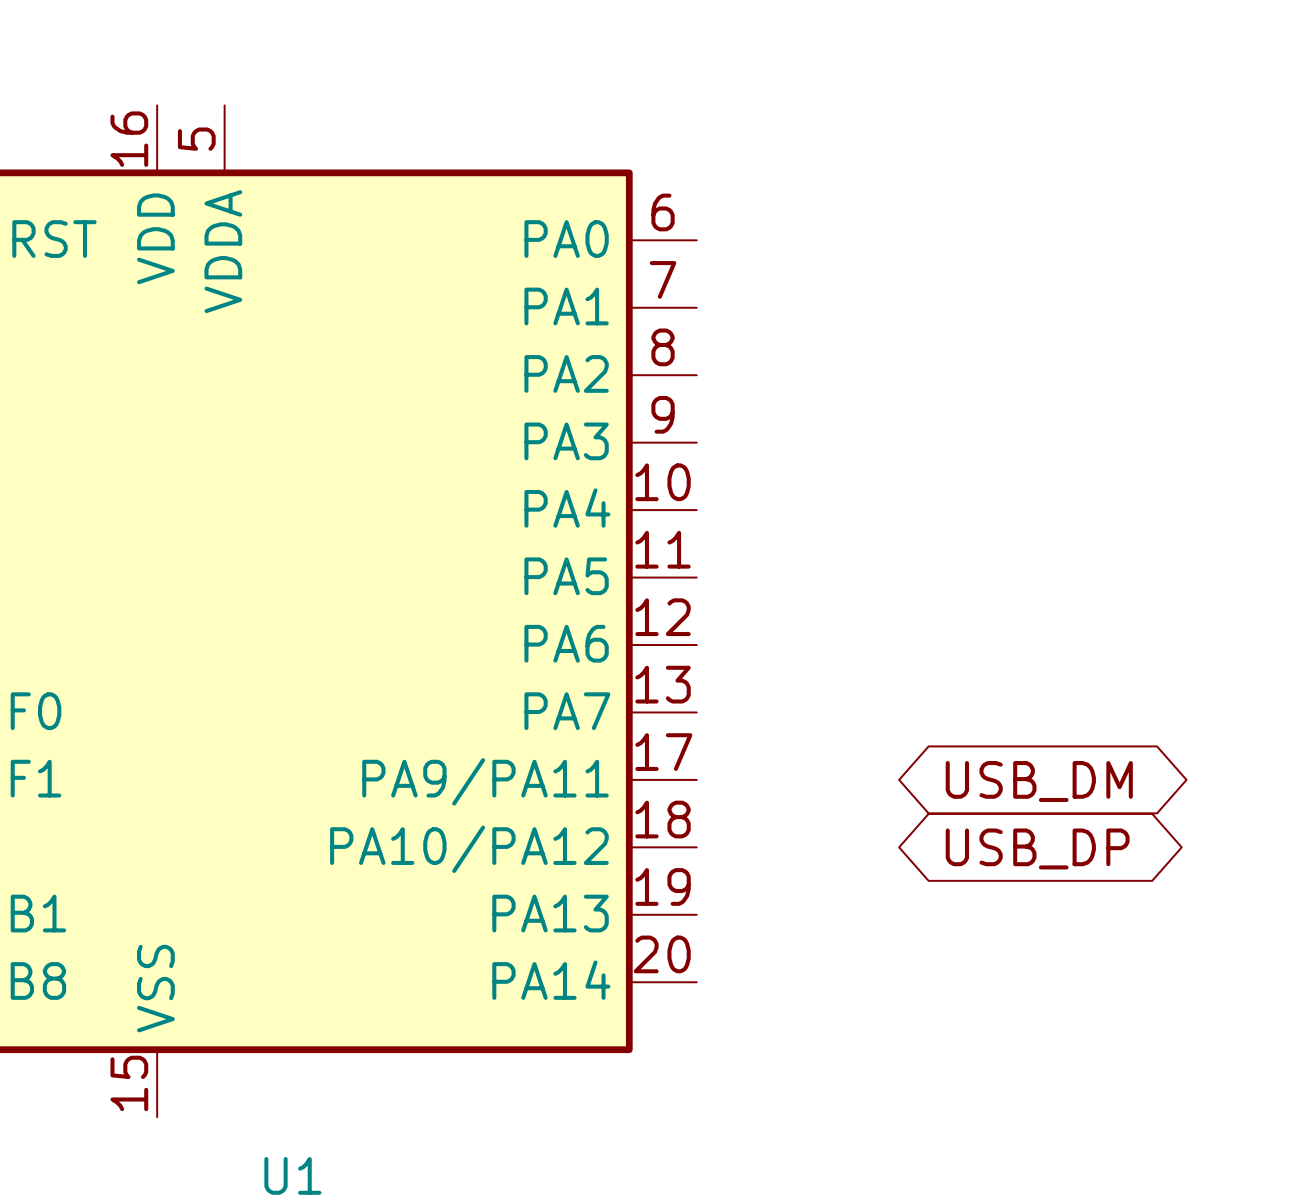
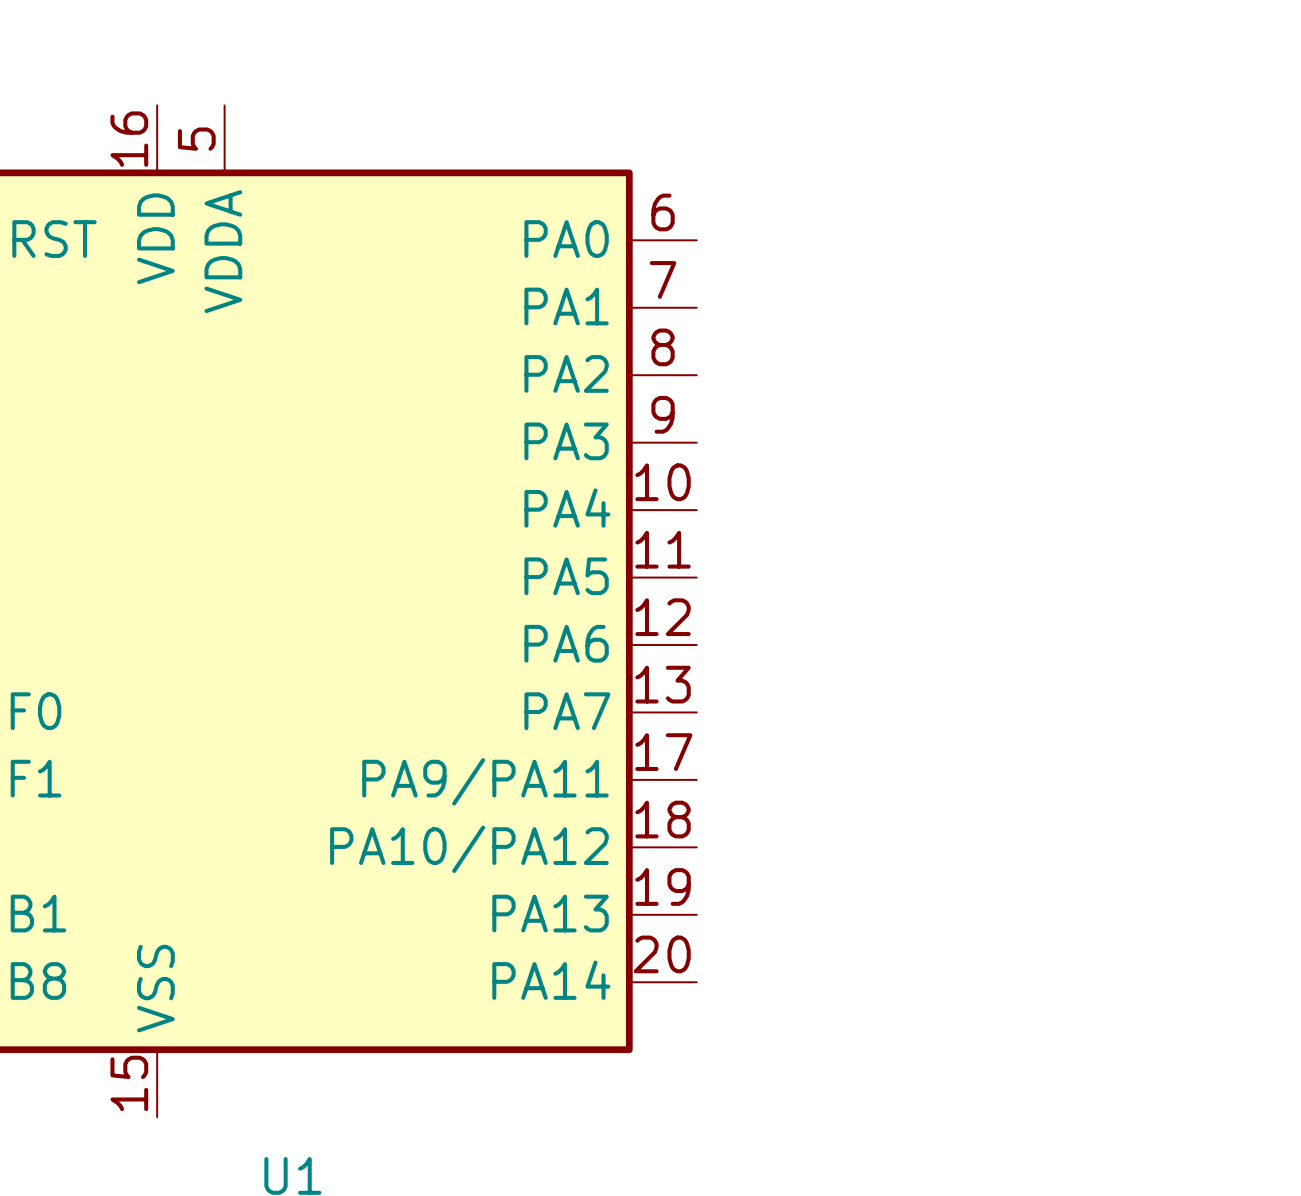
global label: USB_DM (1039, 781) -> none
global label: USB_DP (1037, 848) -> none

